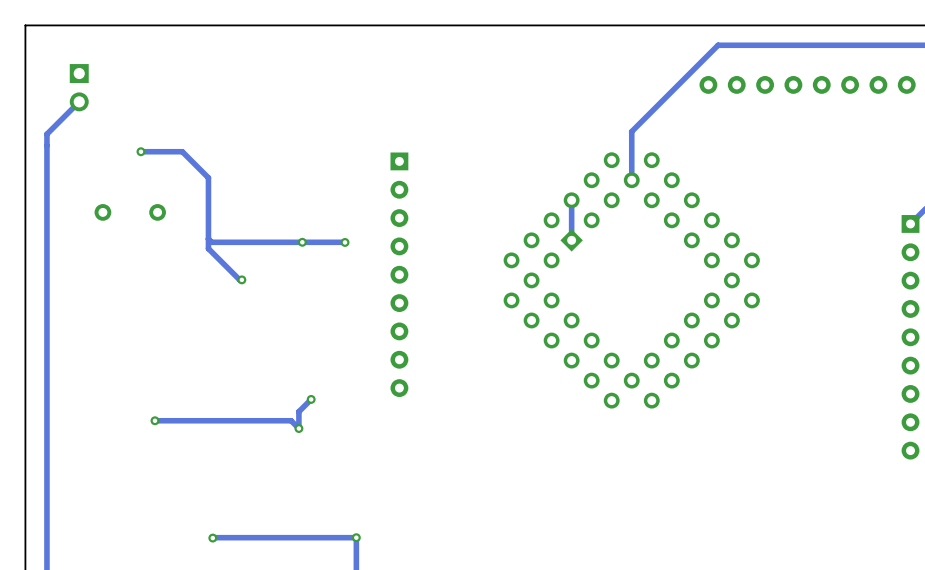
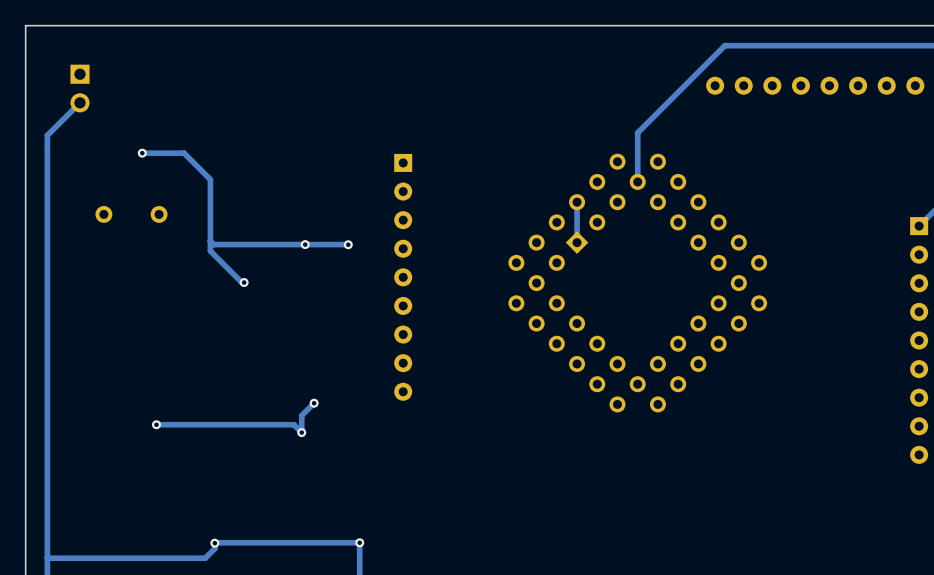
track: none -> (214, 543) (214, 548) (205, 558) (47, 557)

